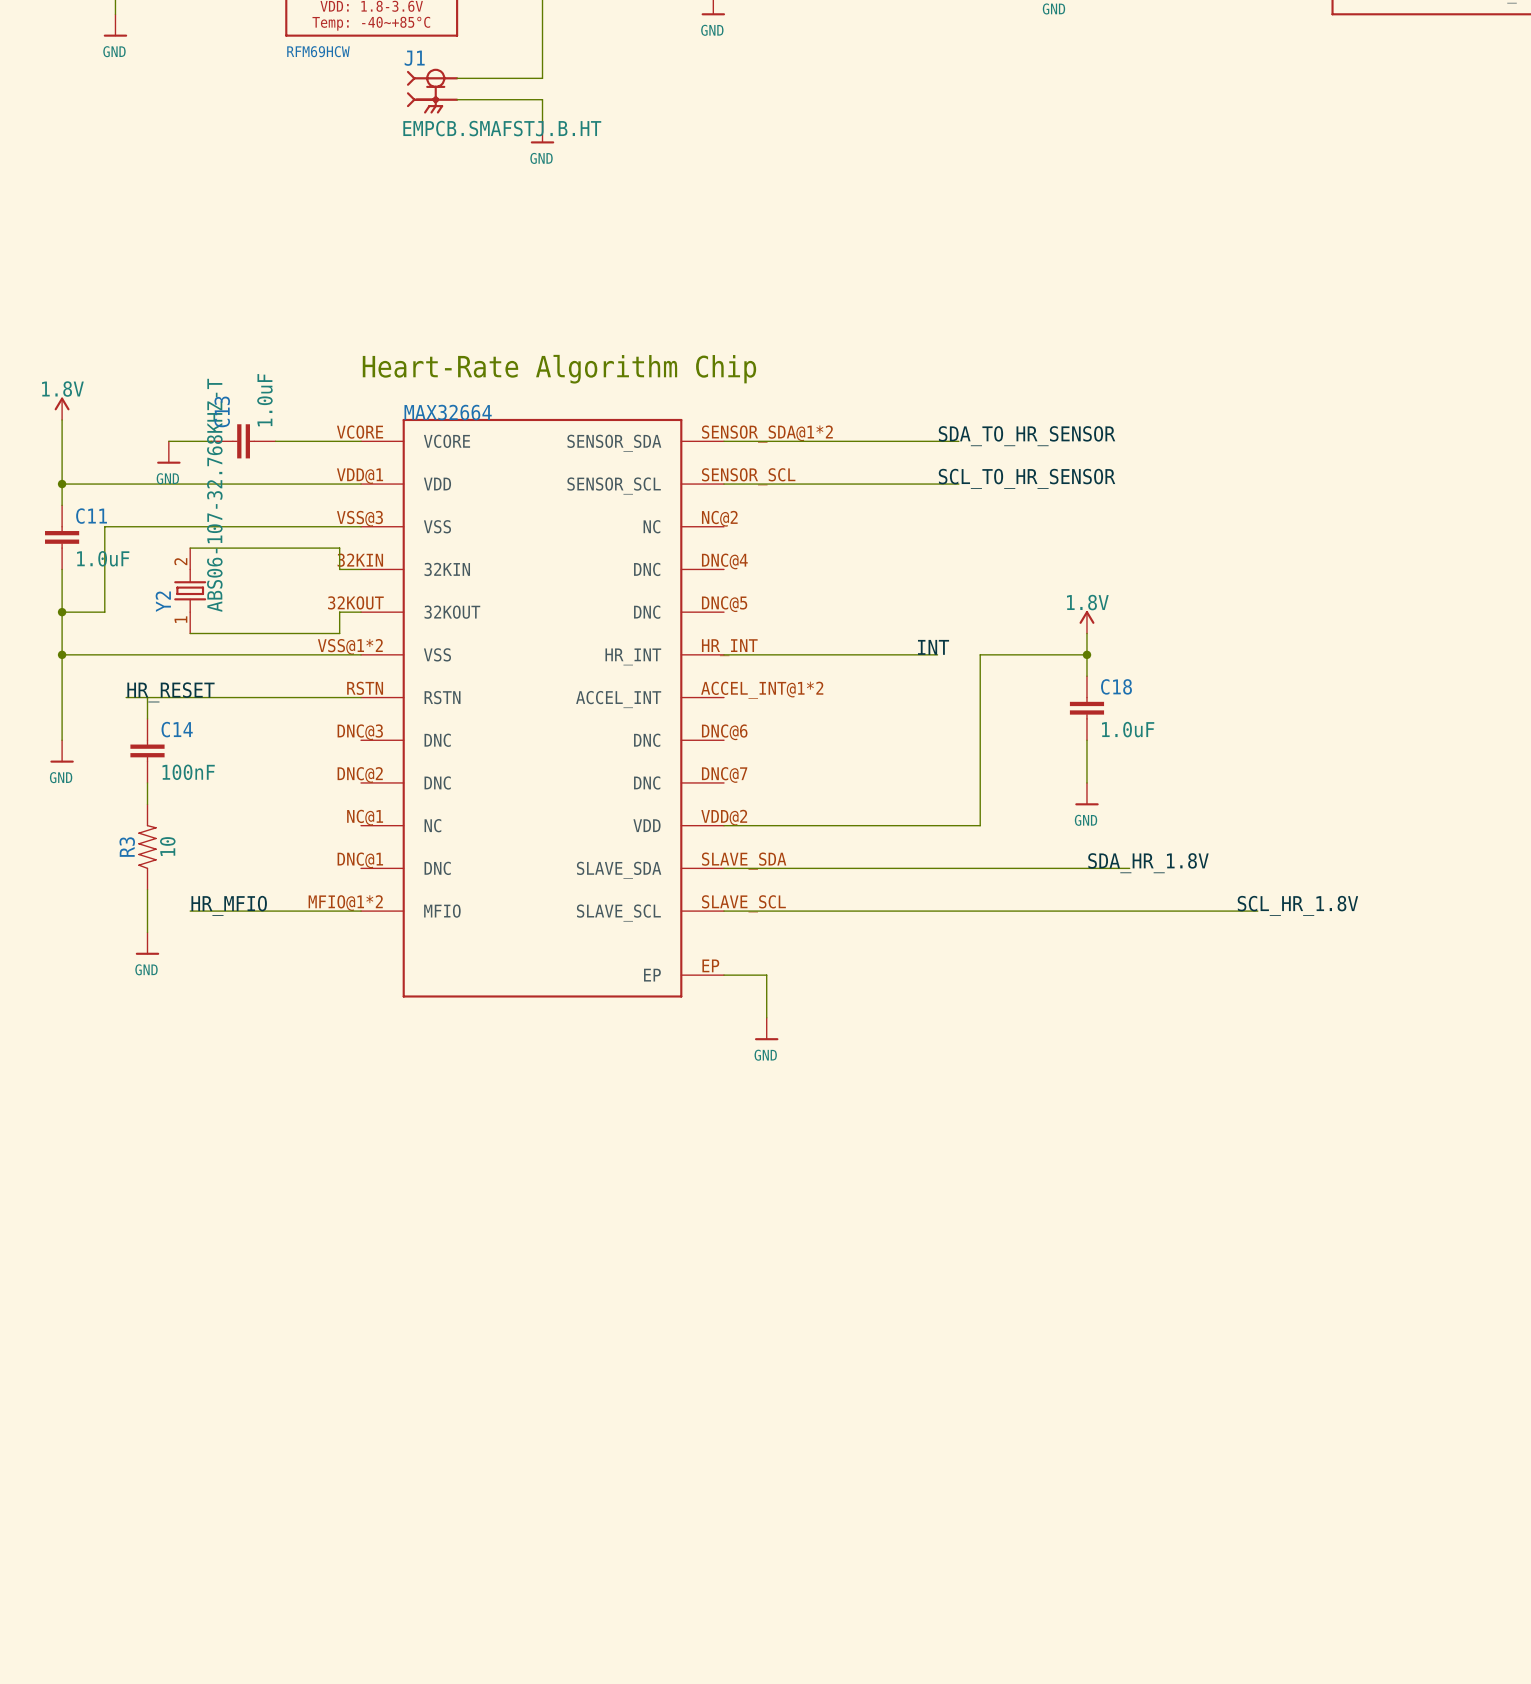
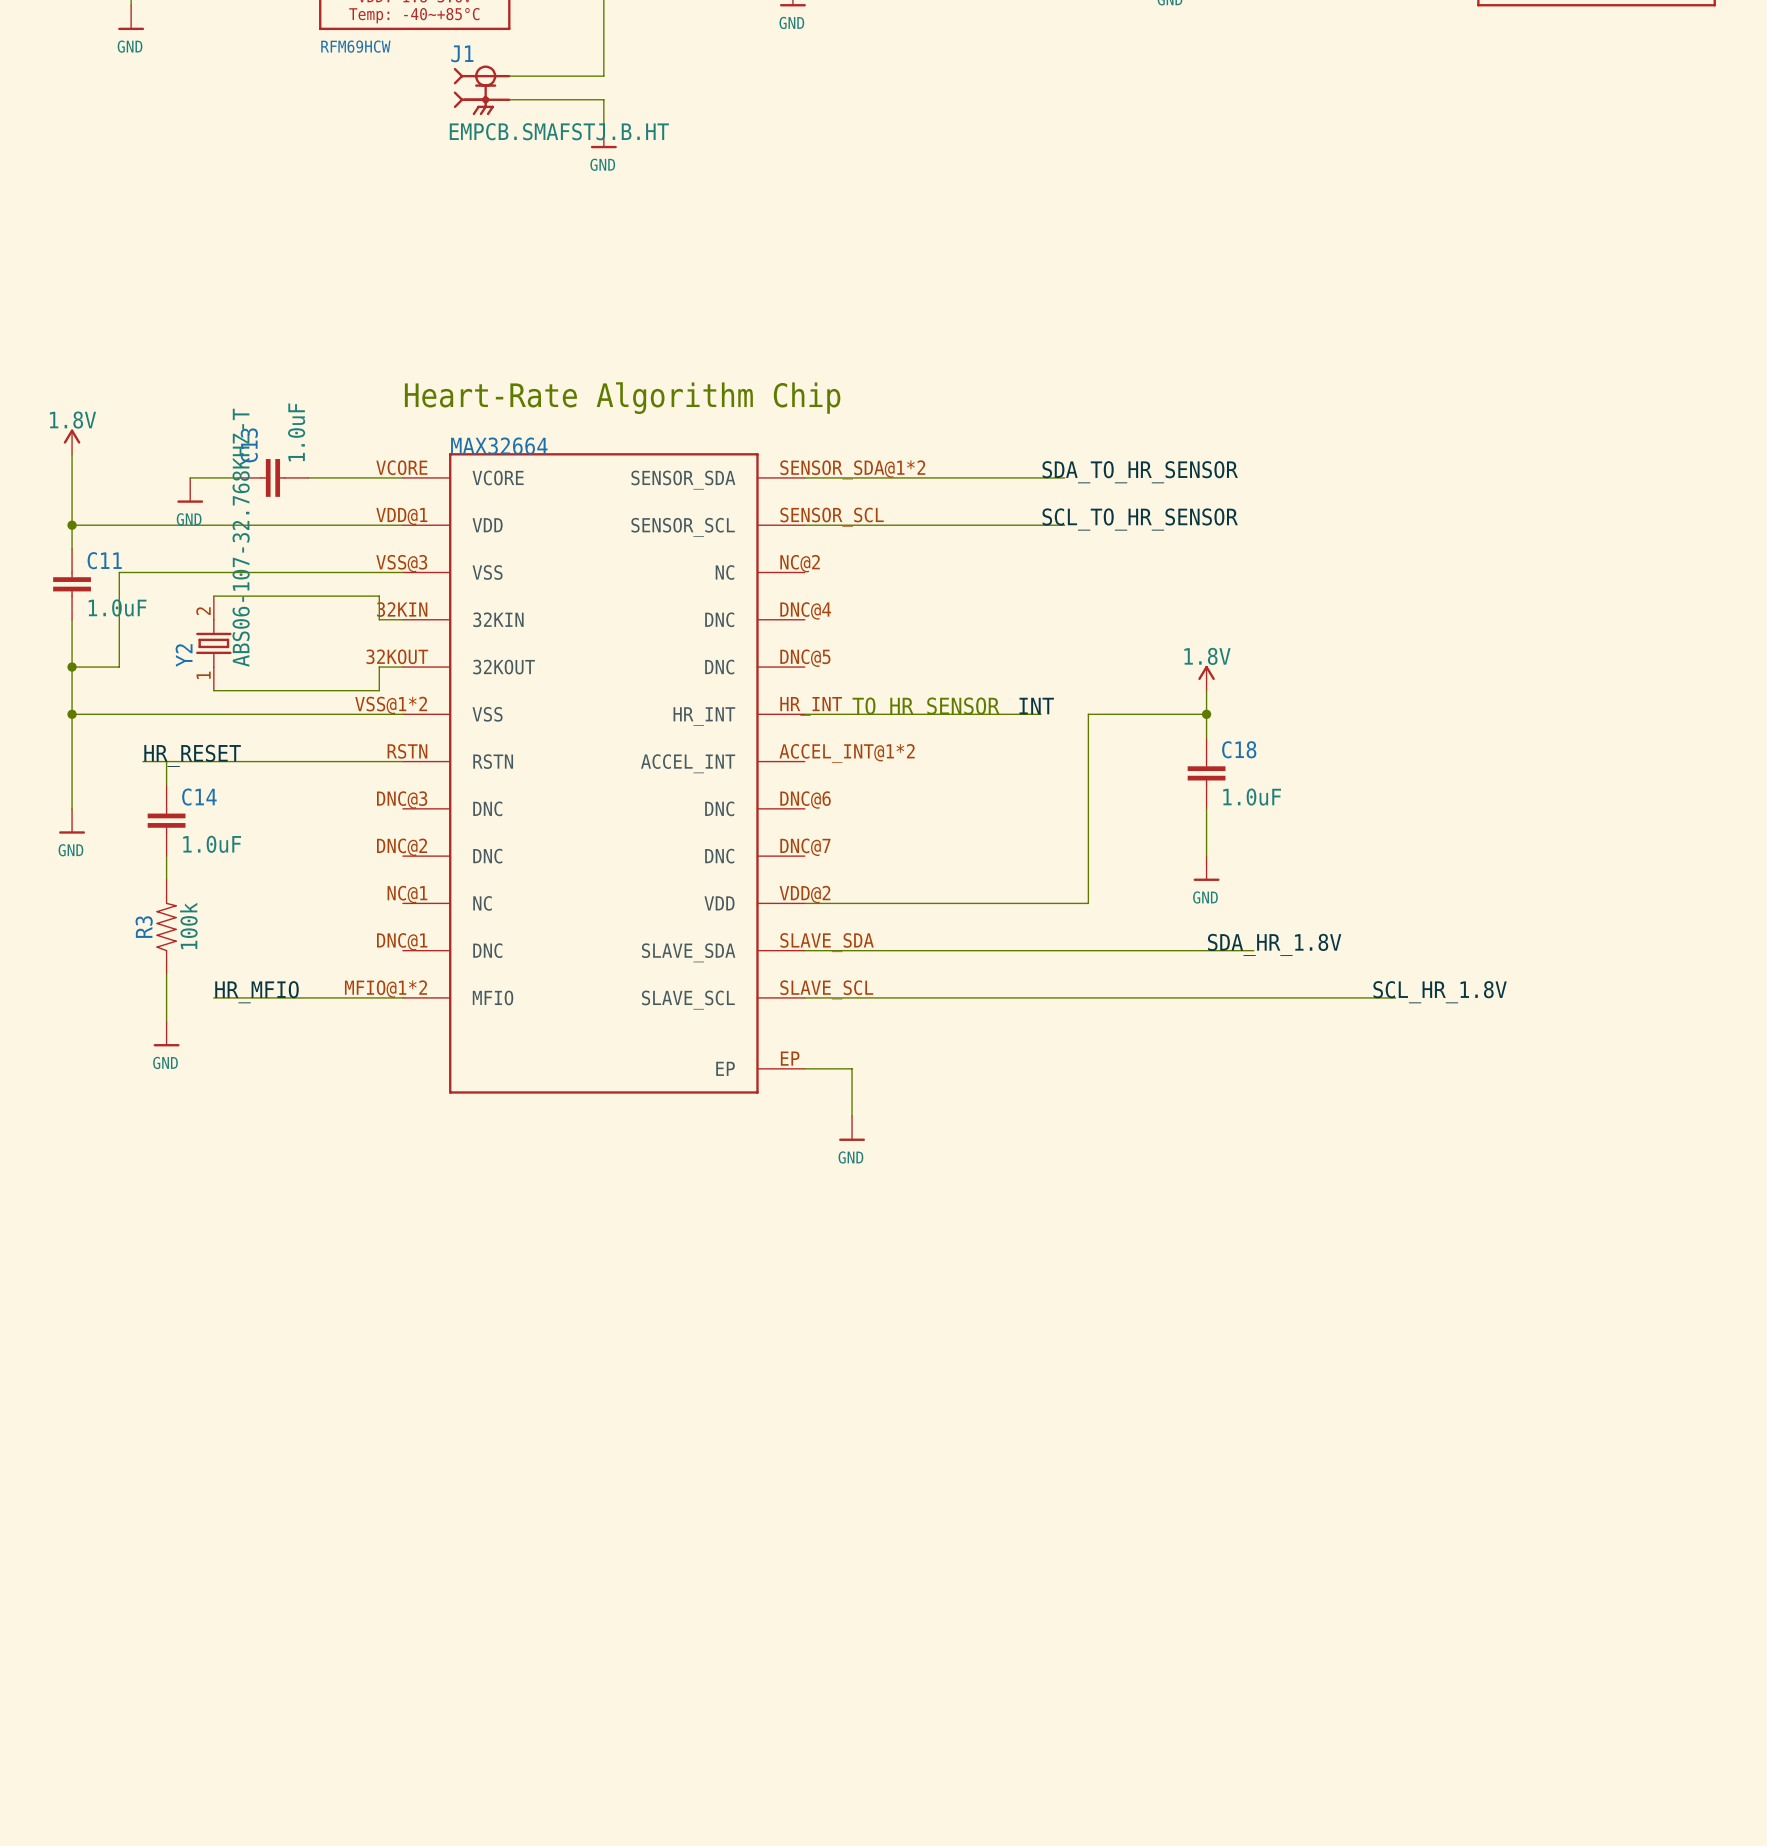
text: none -> TO HR SENSOR (926, 706)
C14 value: 100nF (188, 772) -> 1.0uF (212, 844)
R3 value: 10 (167, 846) -> 100k (188, 925)

